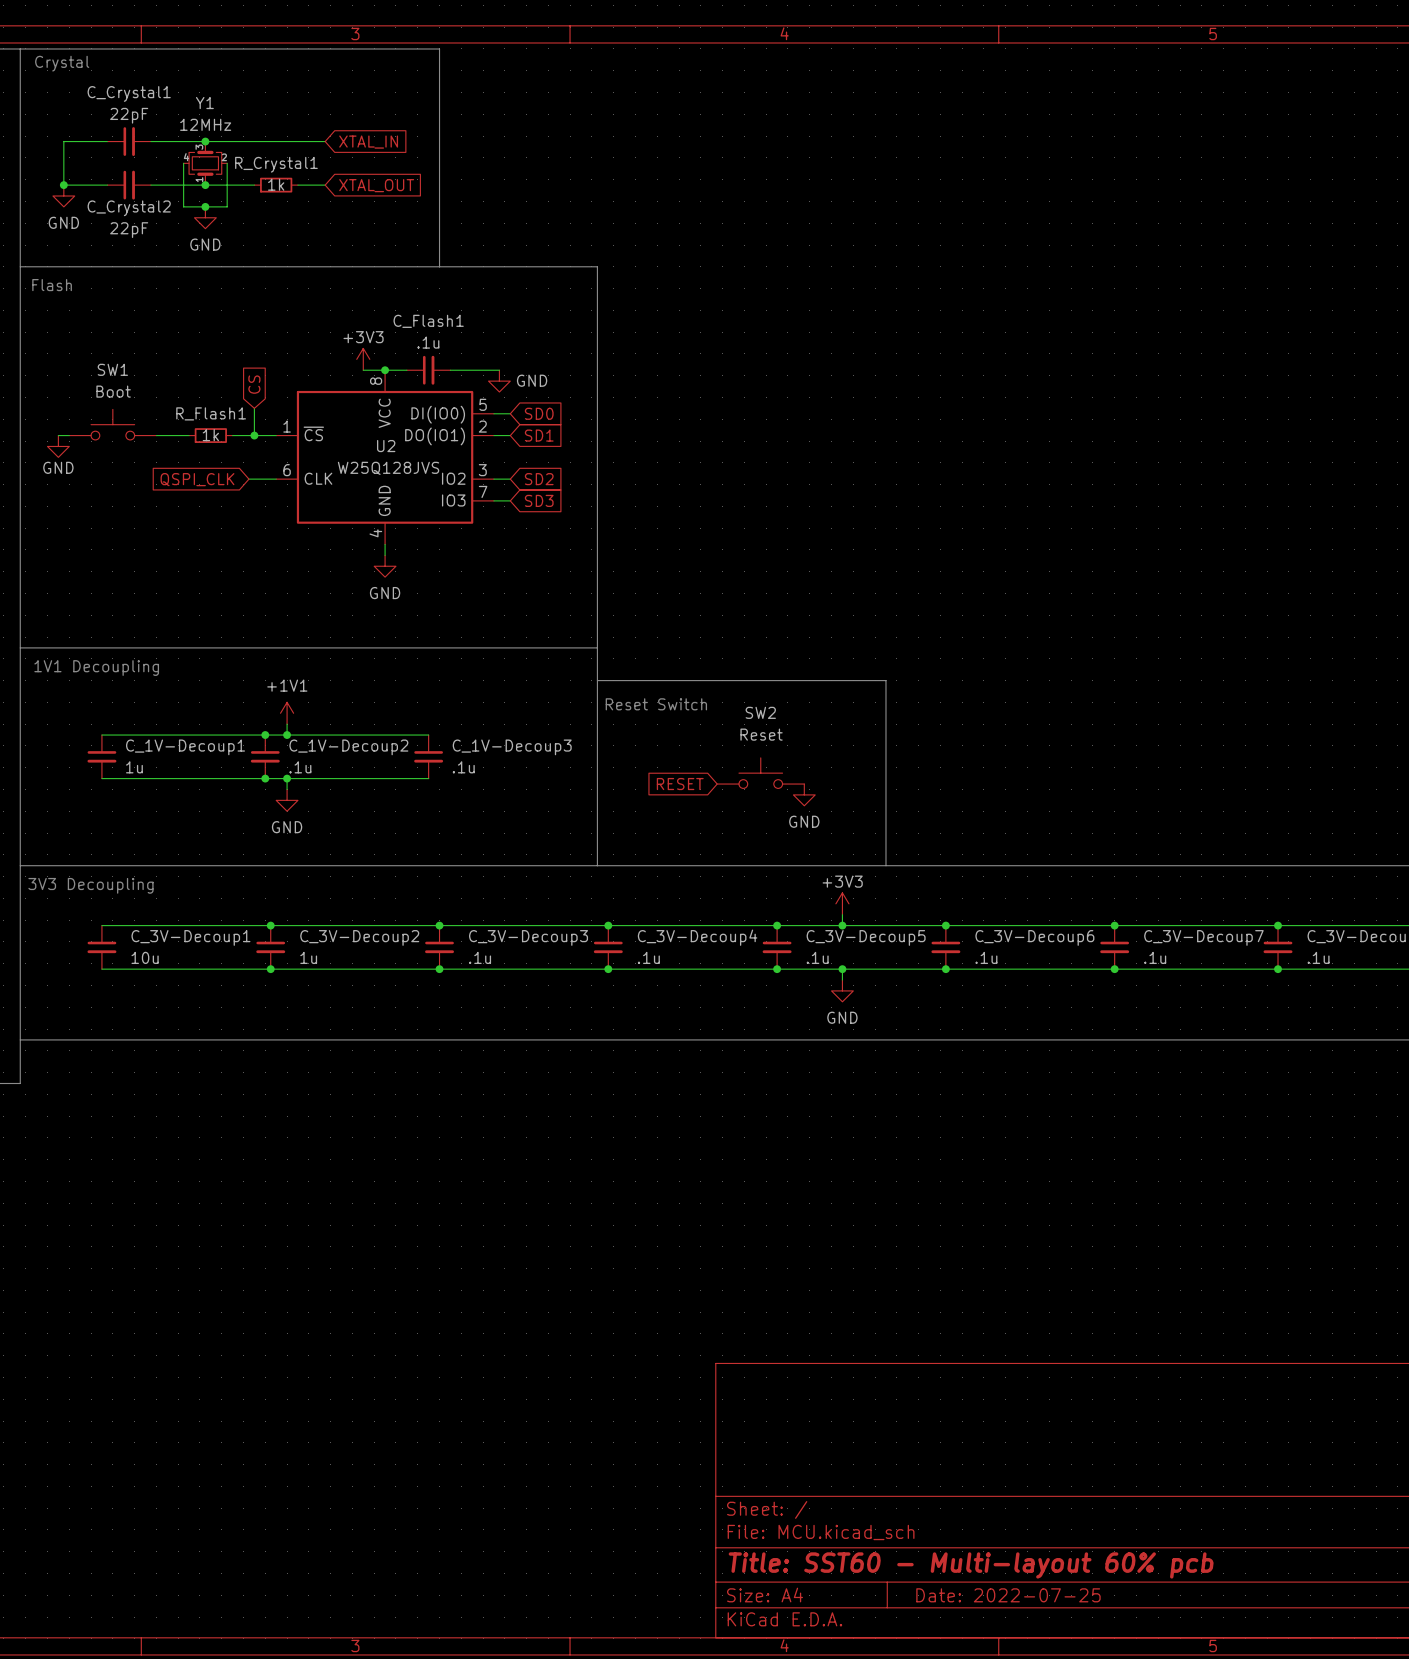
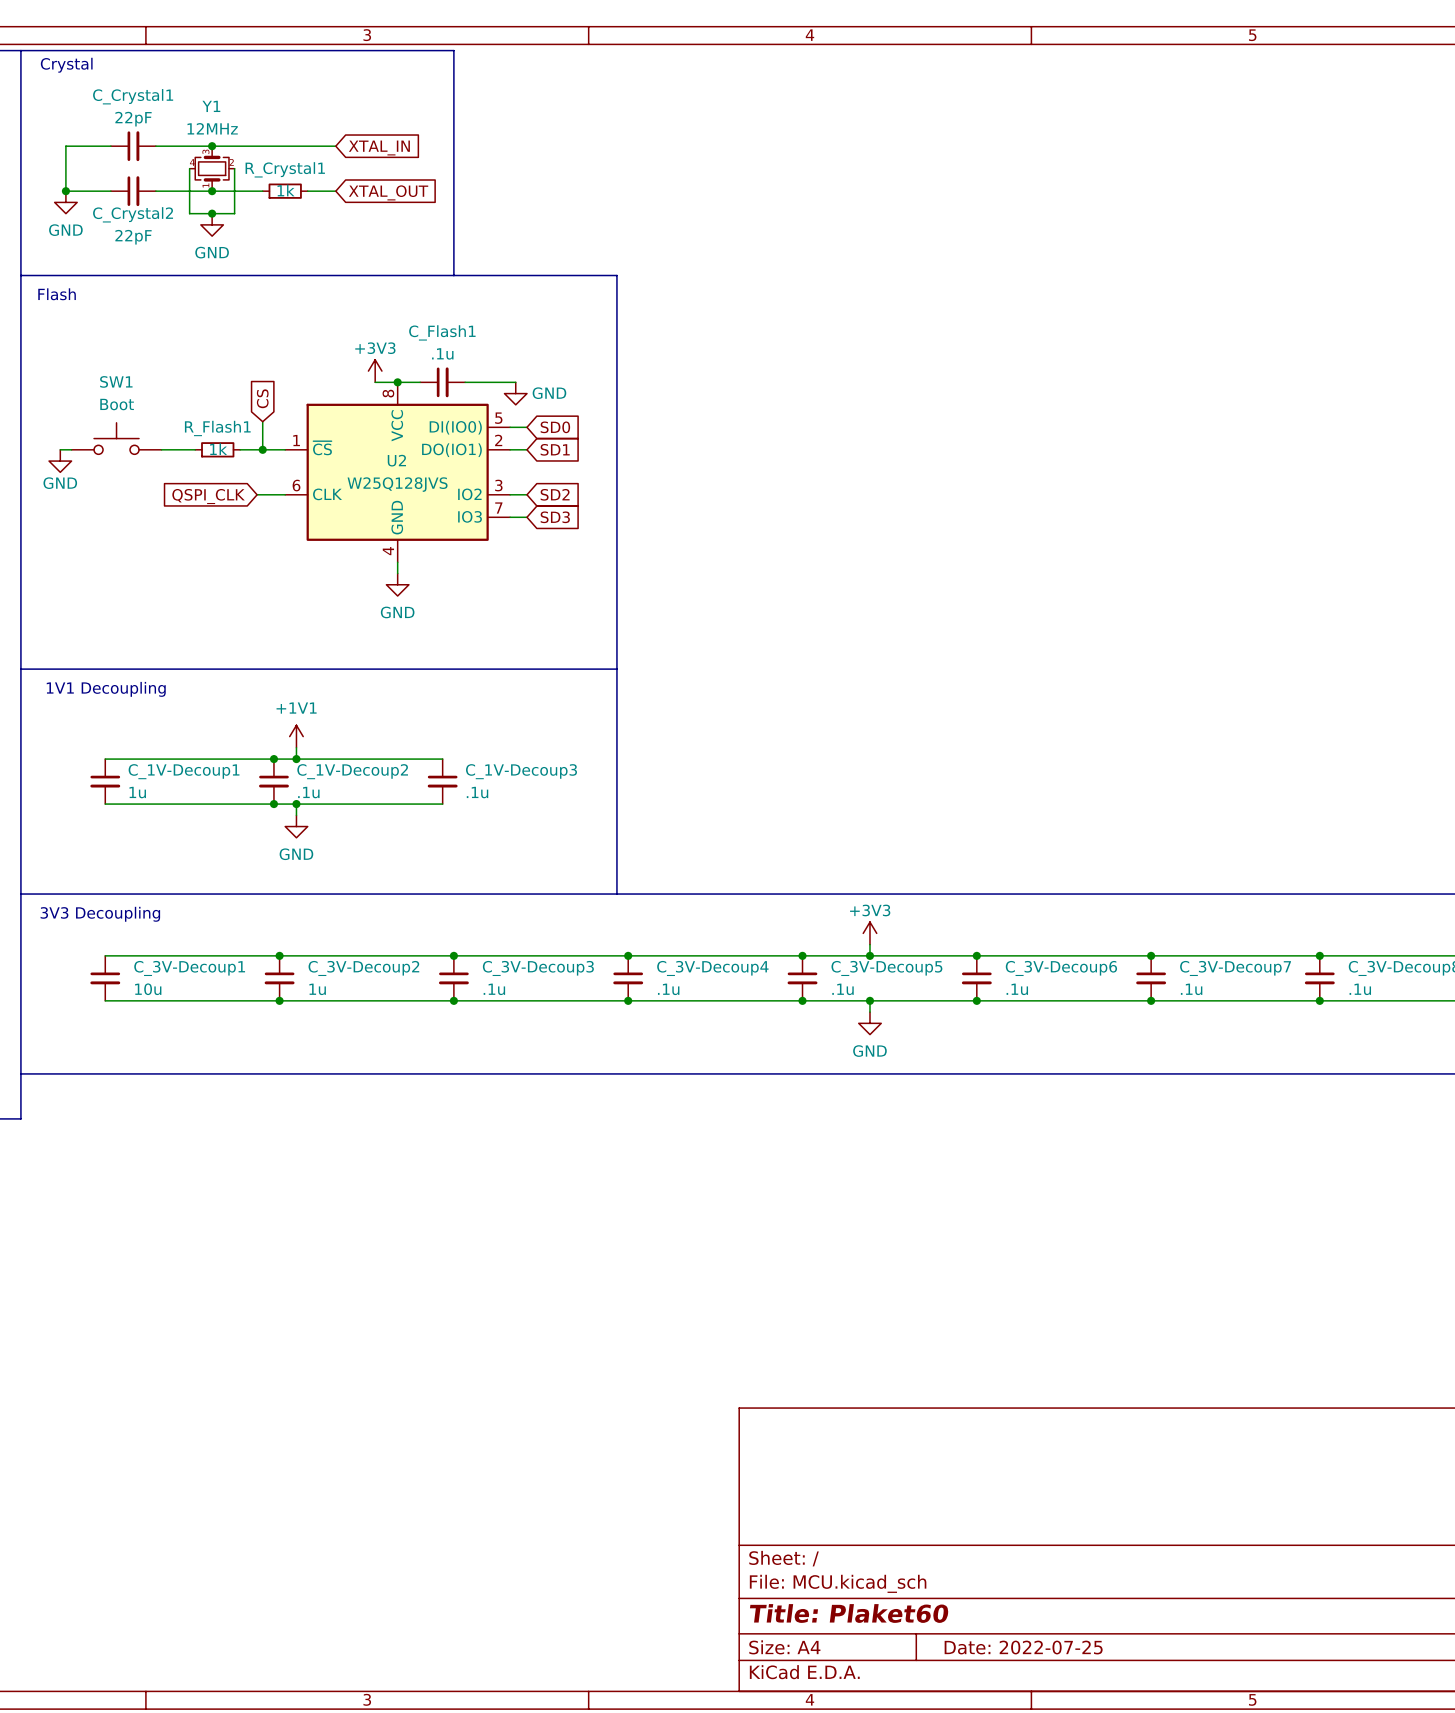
line: (597, 680) (885, 680) (885, 865) -> none
text: Reset Switch (656, 704) -> none
SW2: Reset (760, 773) -> none
global label: RESET (680, 784) -> none
power symbol: GND (804, 794) -> none
title block: Title: SST60 - Multi-layout 60% pcb (971, 1565) -> Title: Plaket60 (849, 1613)

